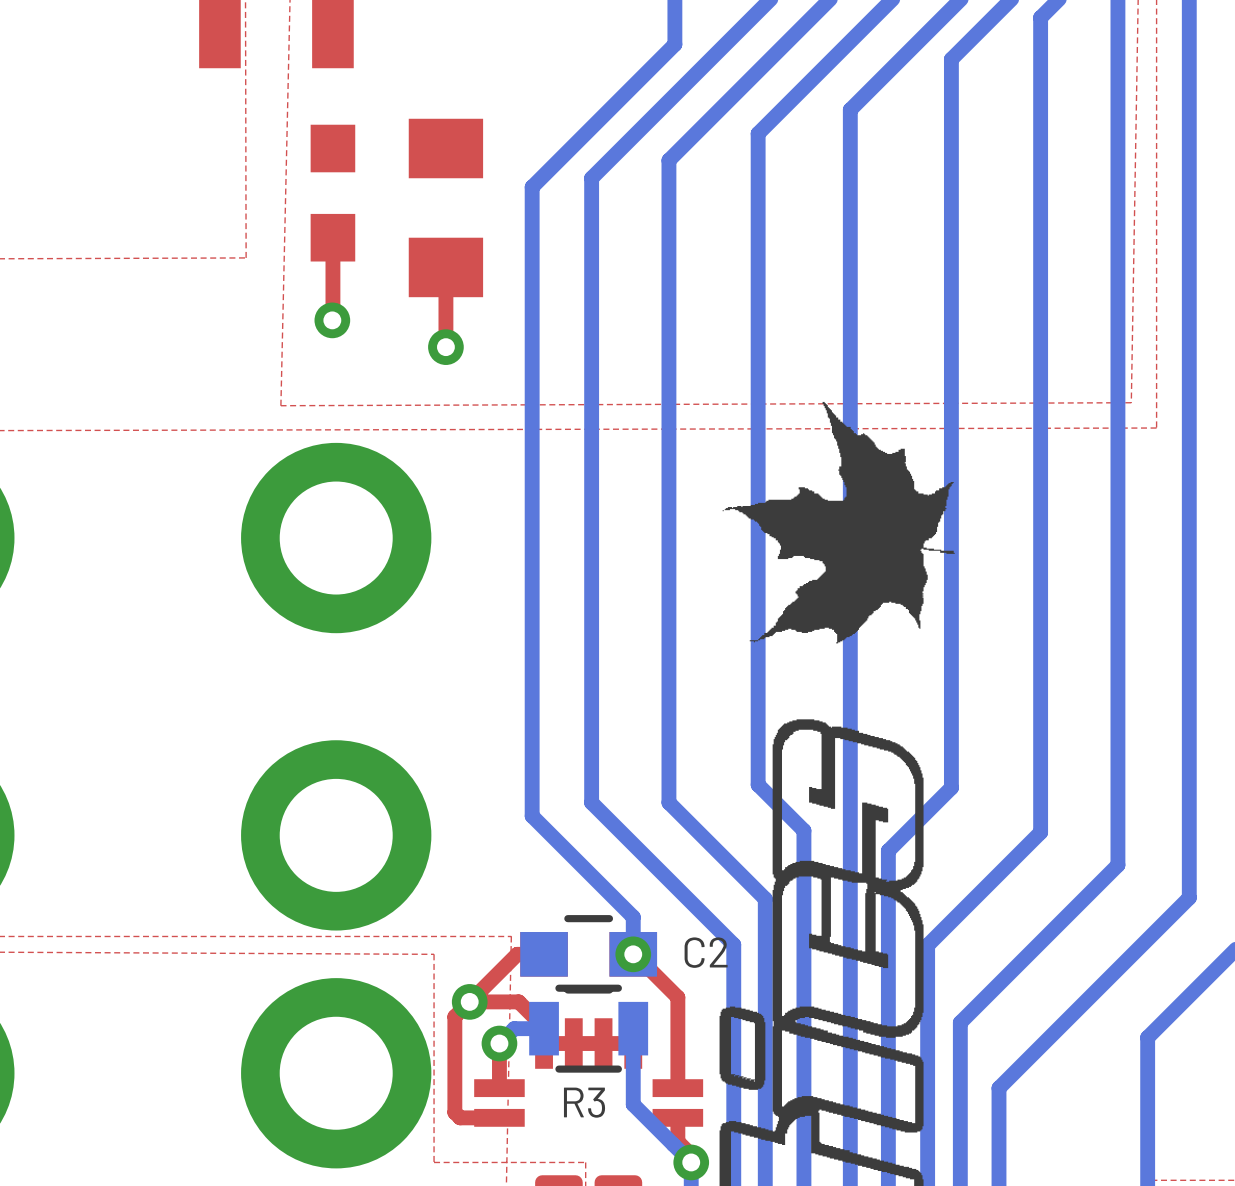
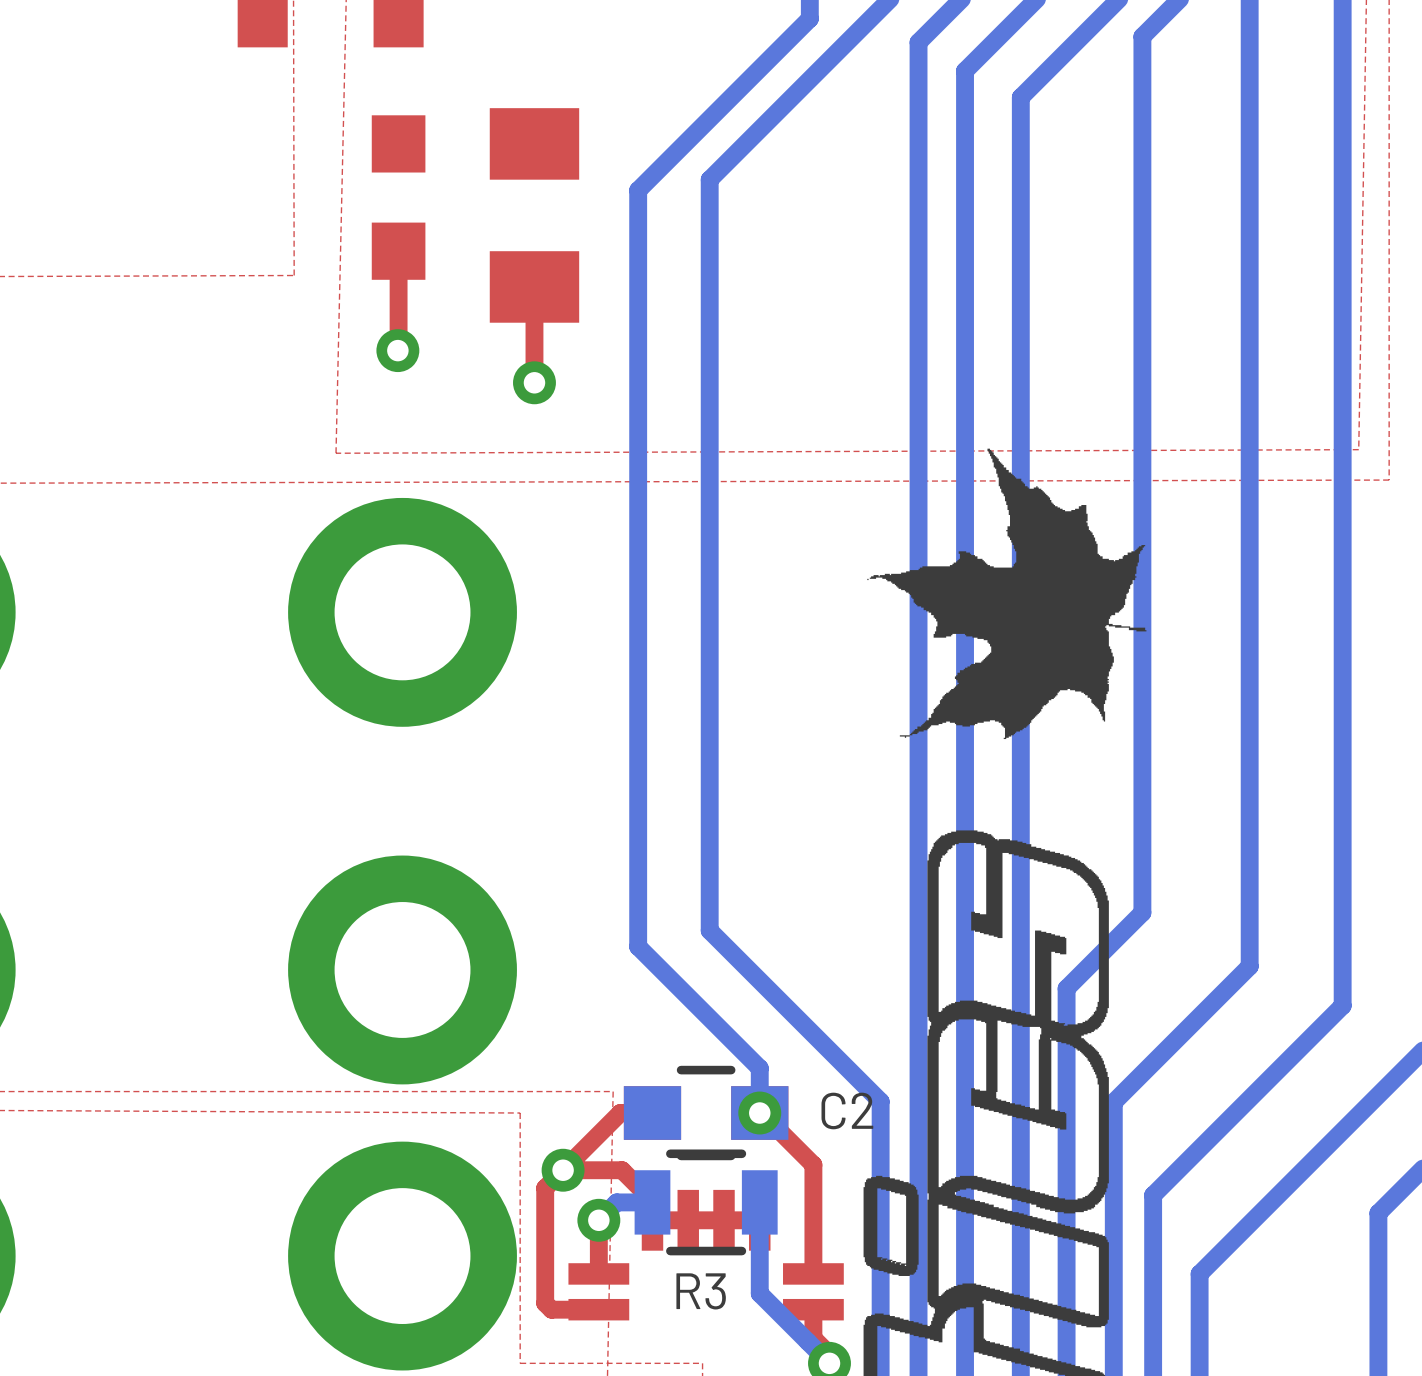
bottom track: (765, 64) (668, 160) (668, 802) (765, 899) -> (918, 42) (918, 1046)
bottom track: (803, 87) (758, 133) (758, 784) (803, 830) -> (965, 70) (965, 964)

